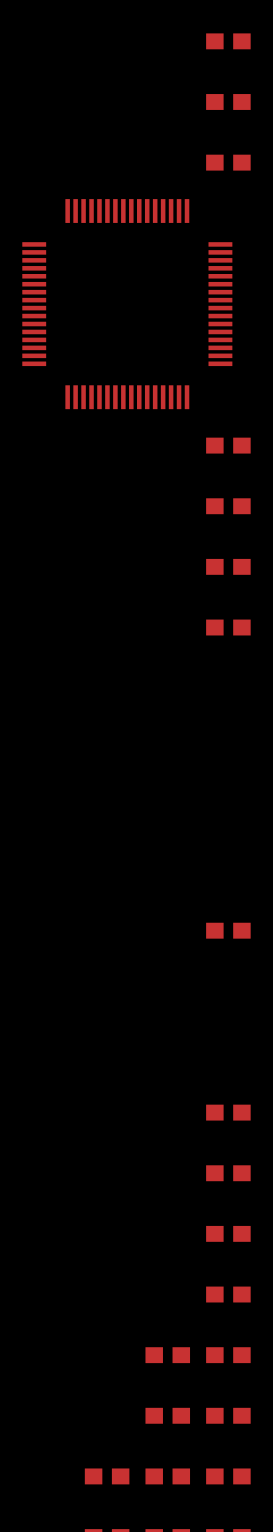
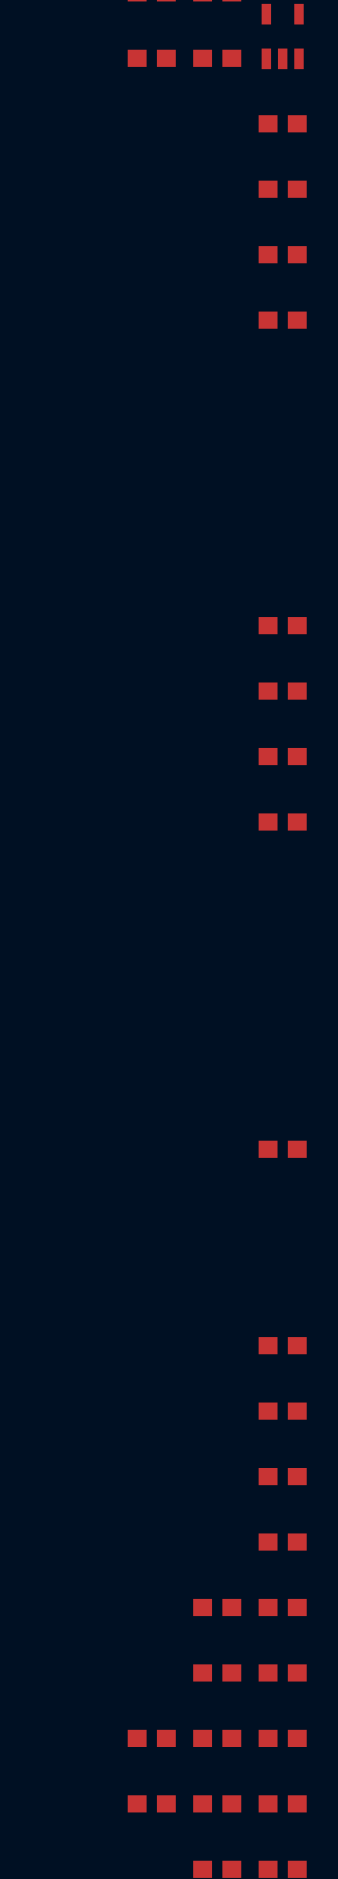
part: (127, 304) -> none

